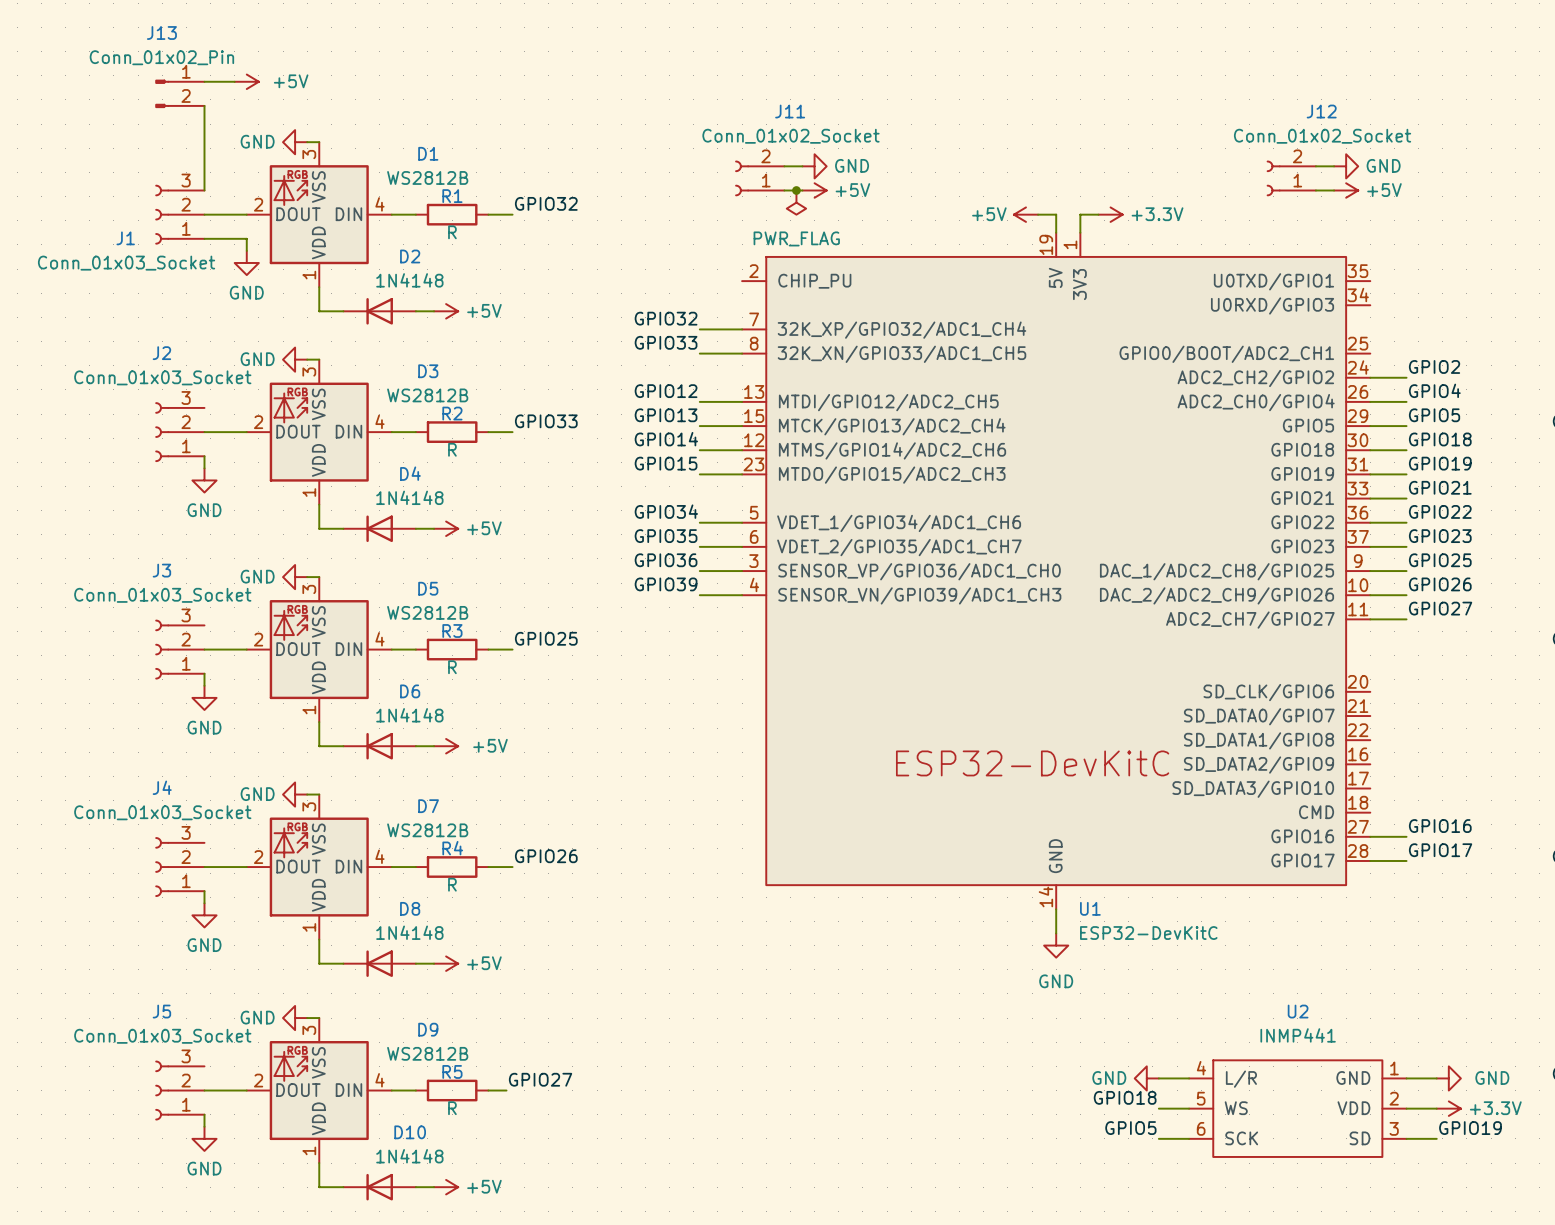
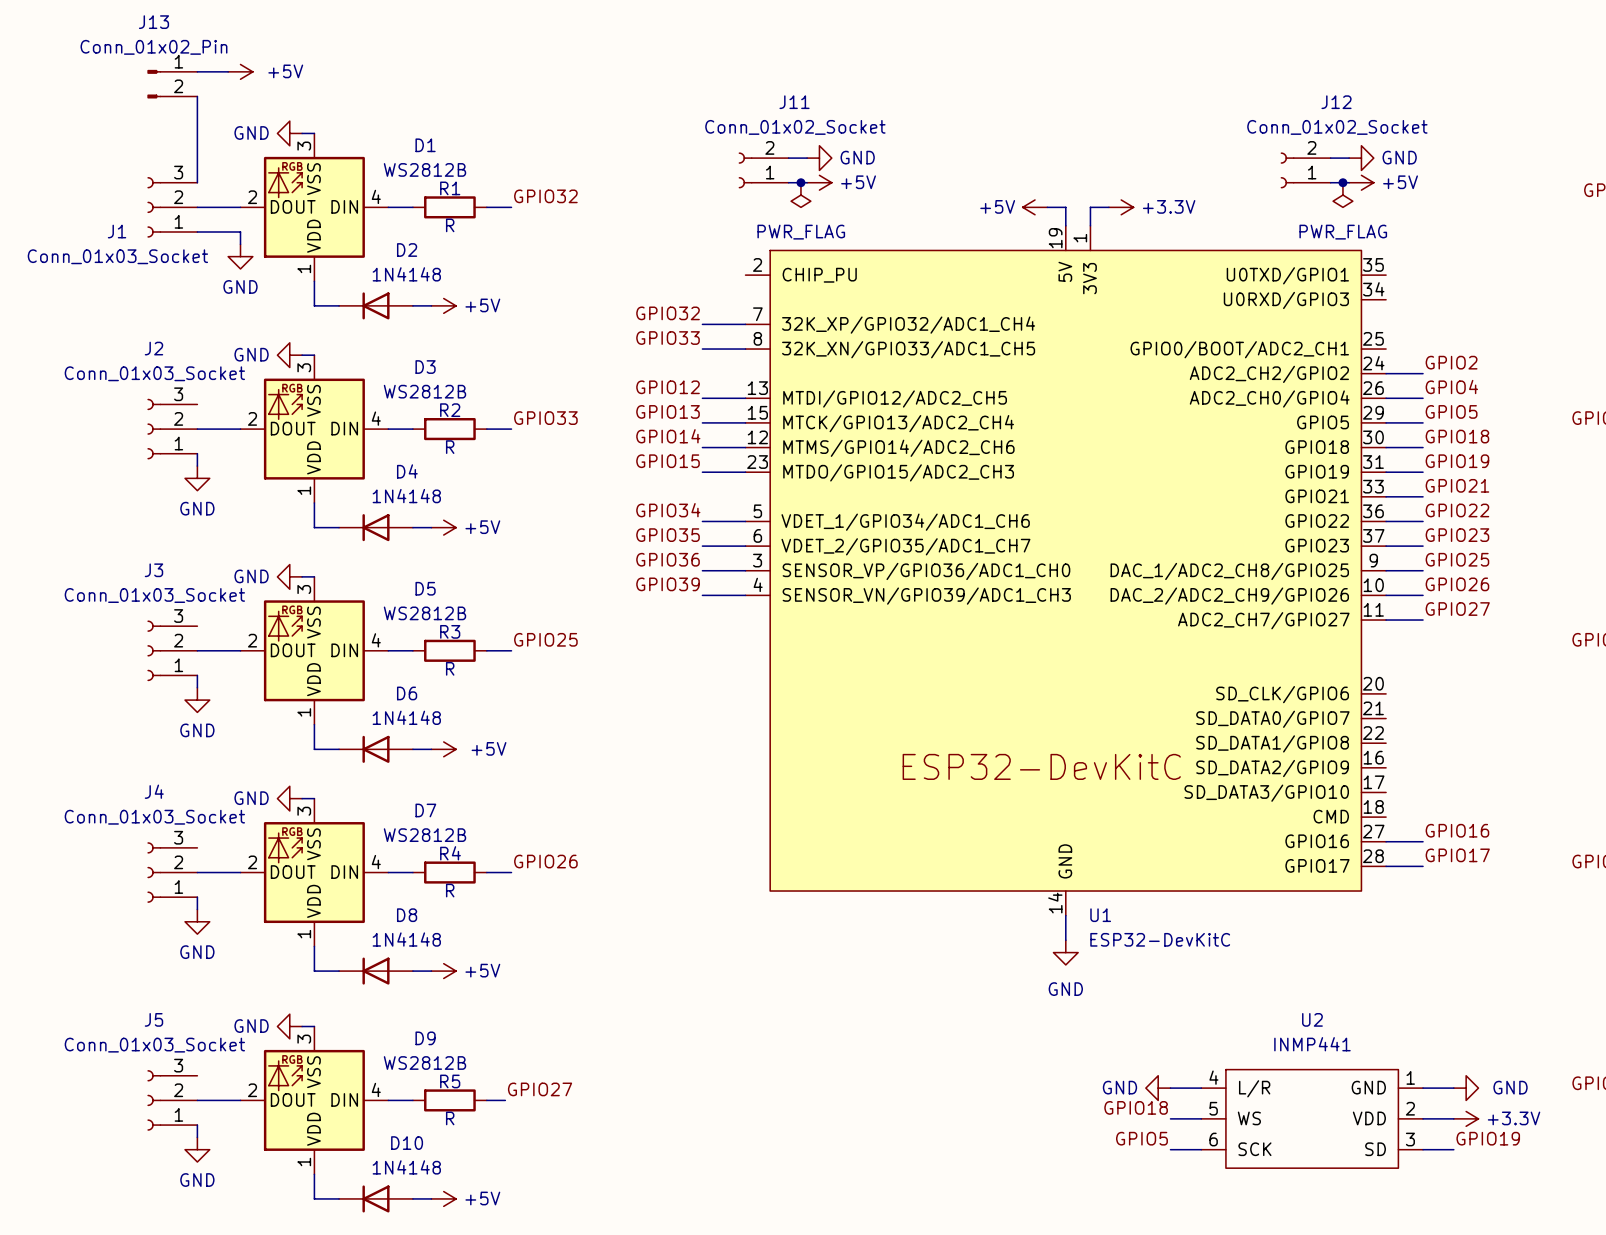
junction: none -> (1342, 182)
power symbol: none -> PWR_FLAG (1342, 195)

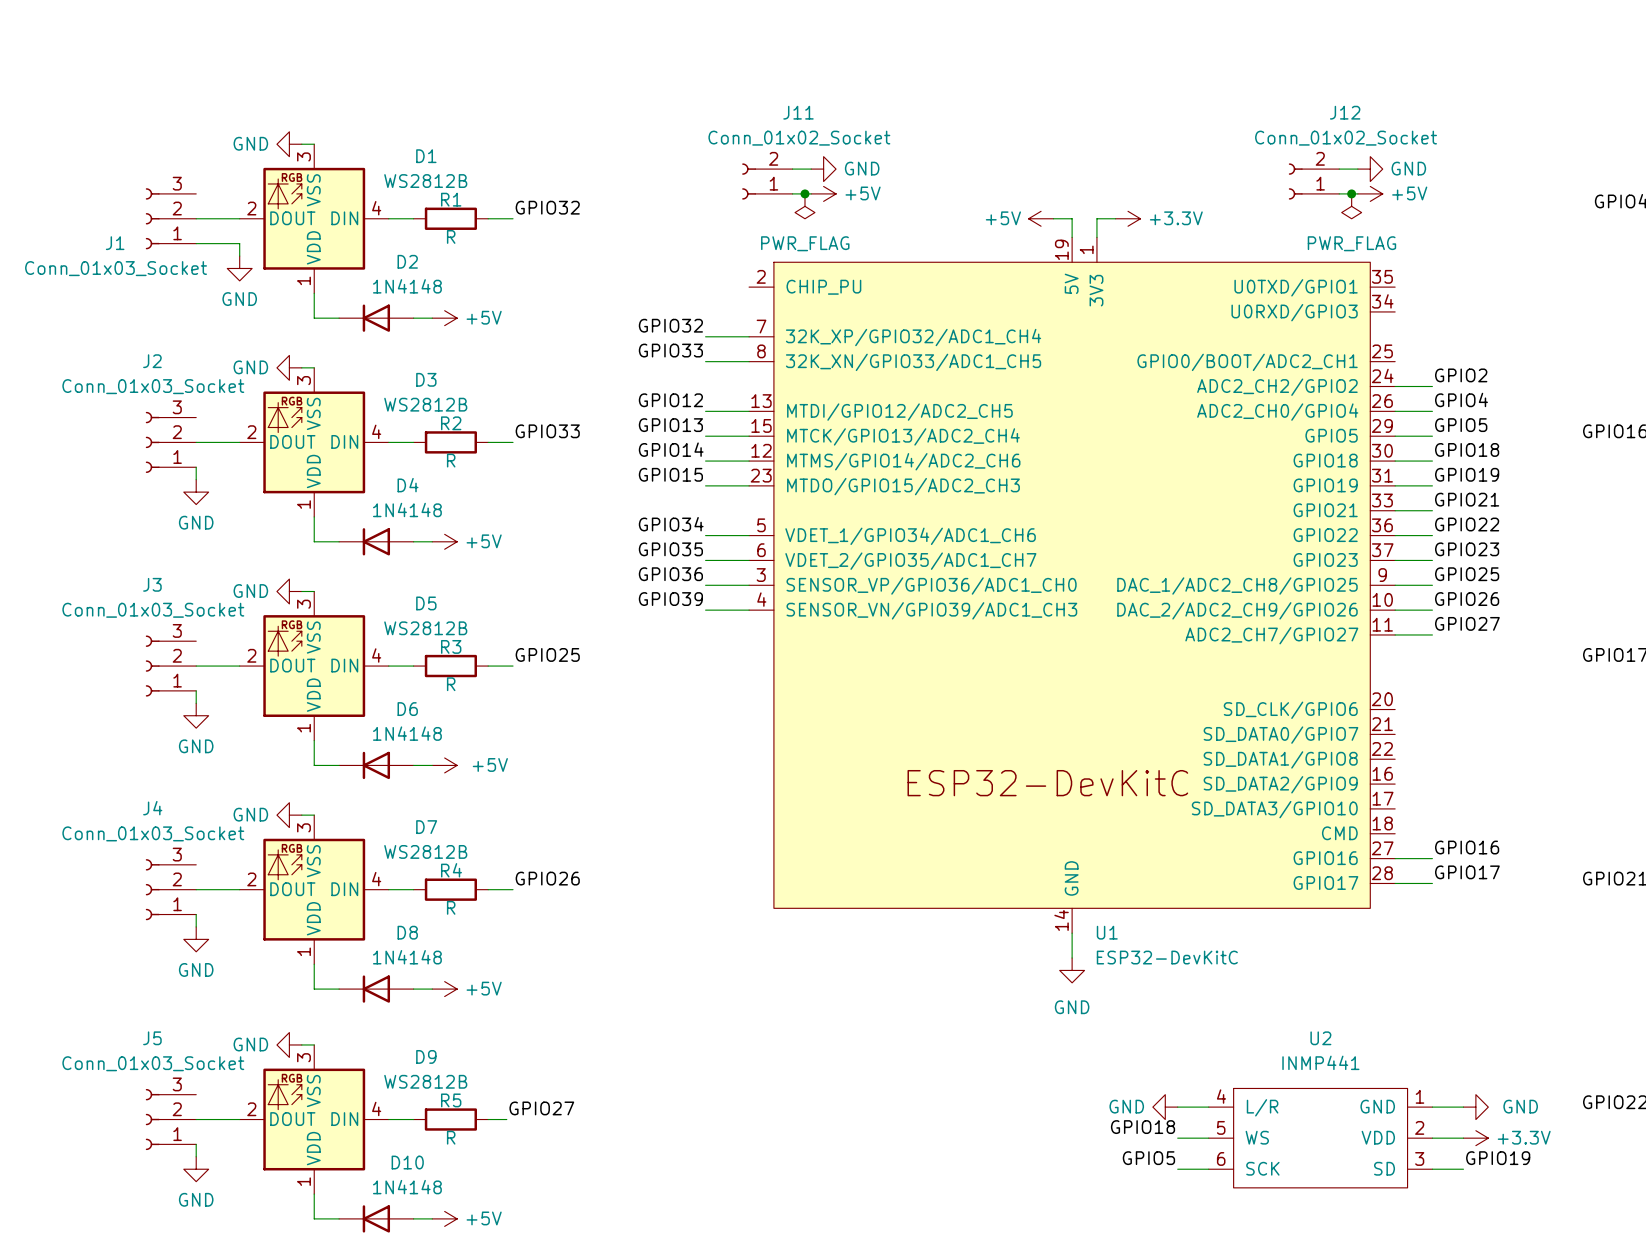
wire: (197, 71) (228, 71) -> none
power symbol: +5V (240, 71) -> none
J13: Conn_01x02_Pin (172, 84) -> none
wire: (197, 96) (197, 182) -> none

